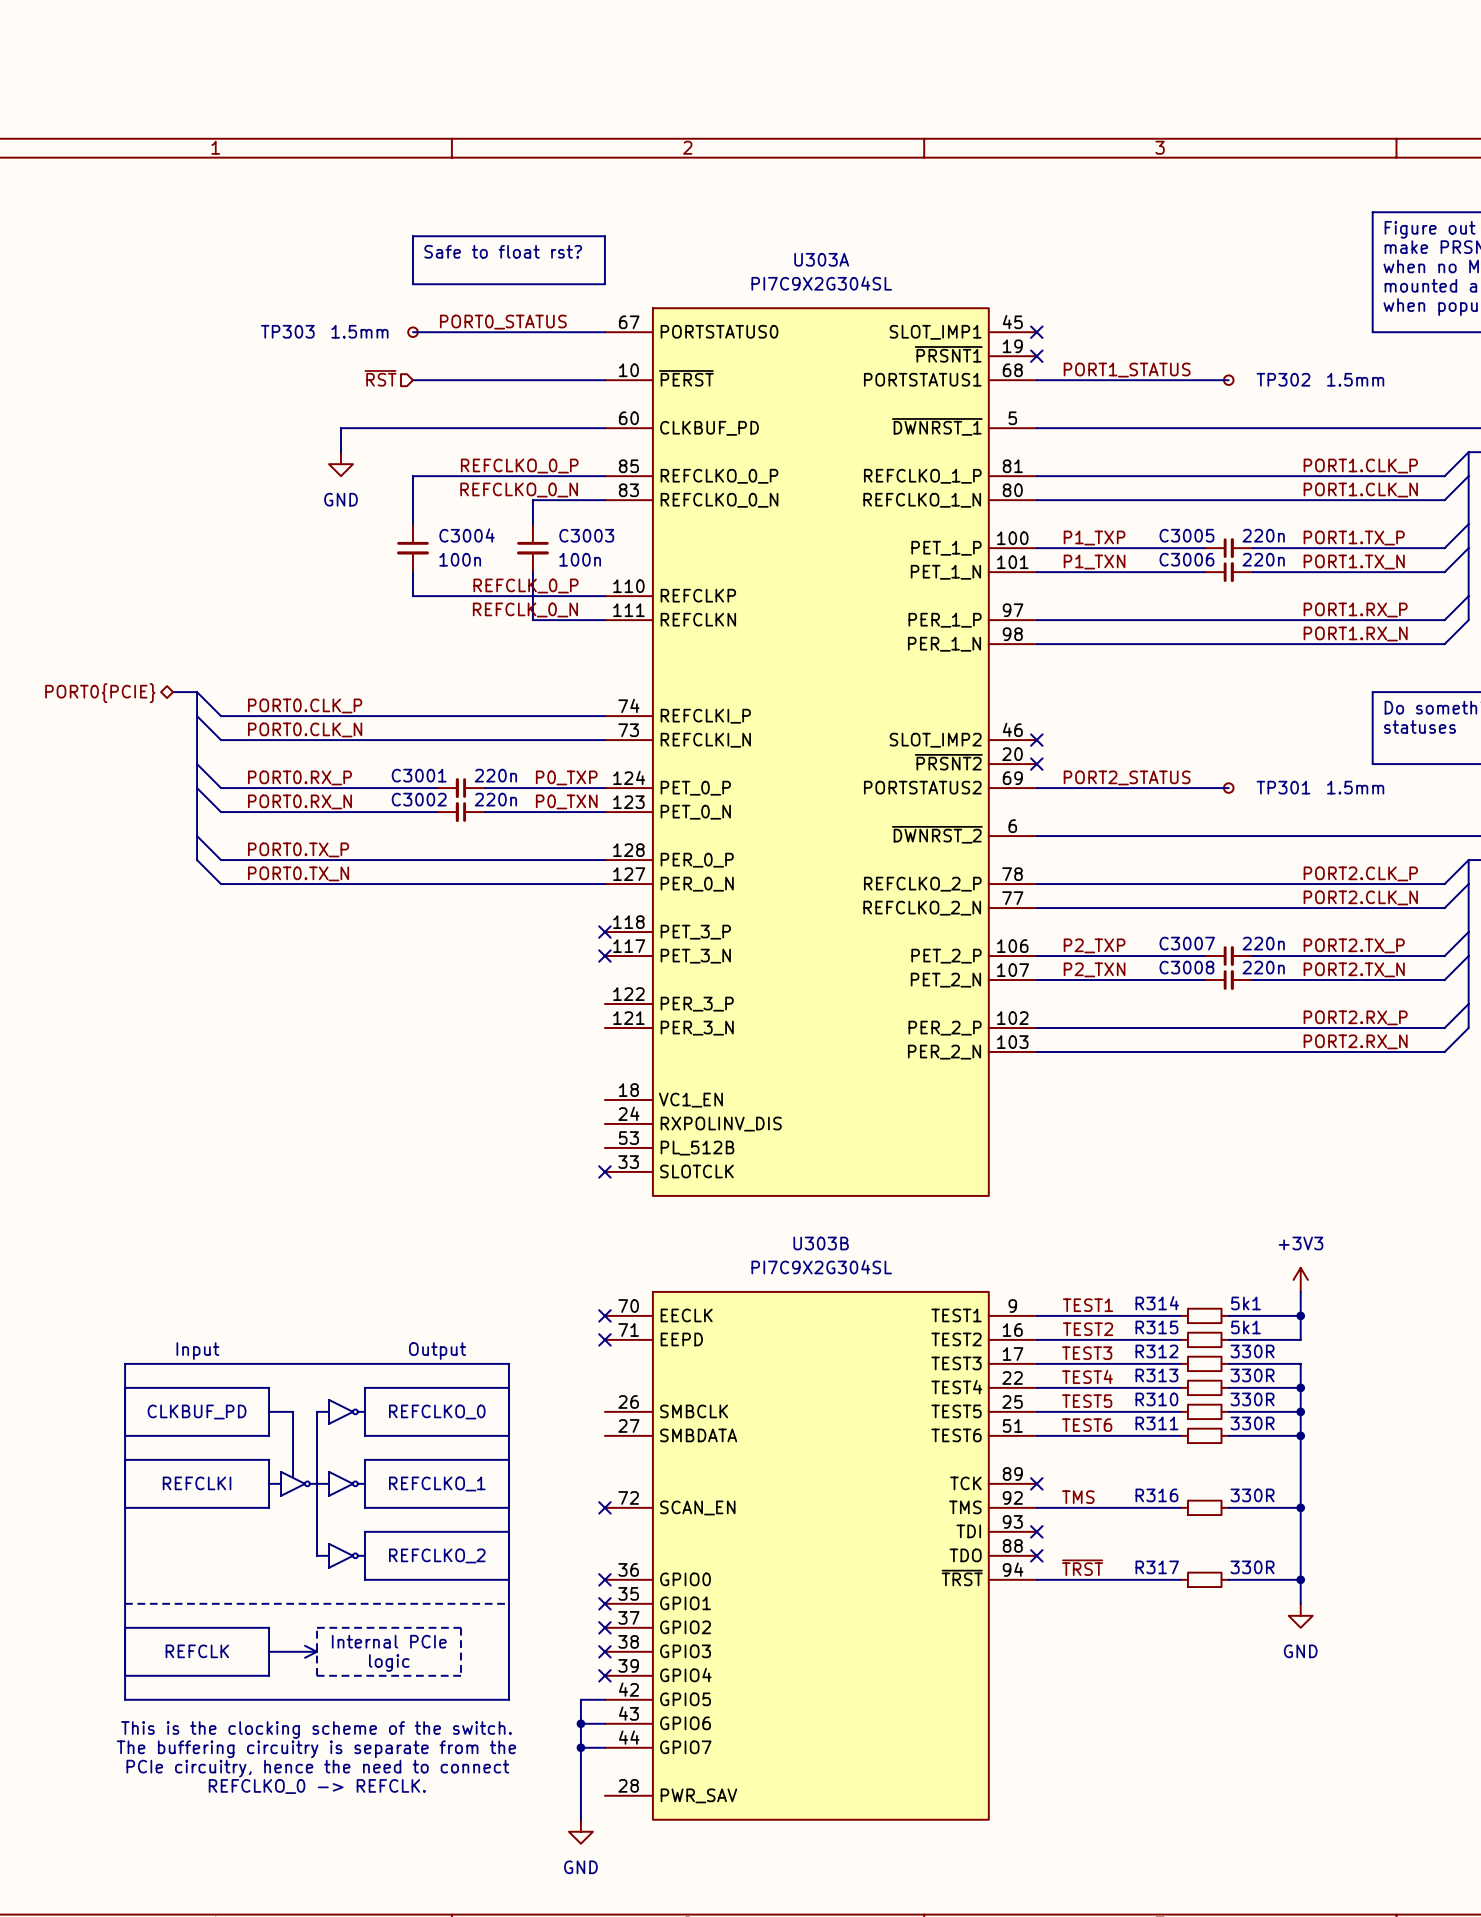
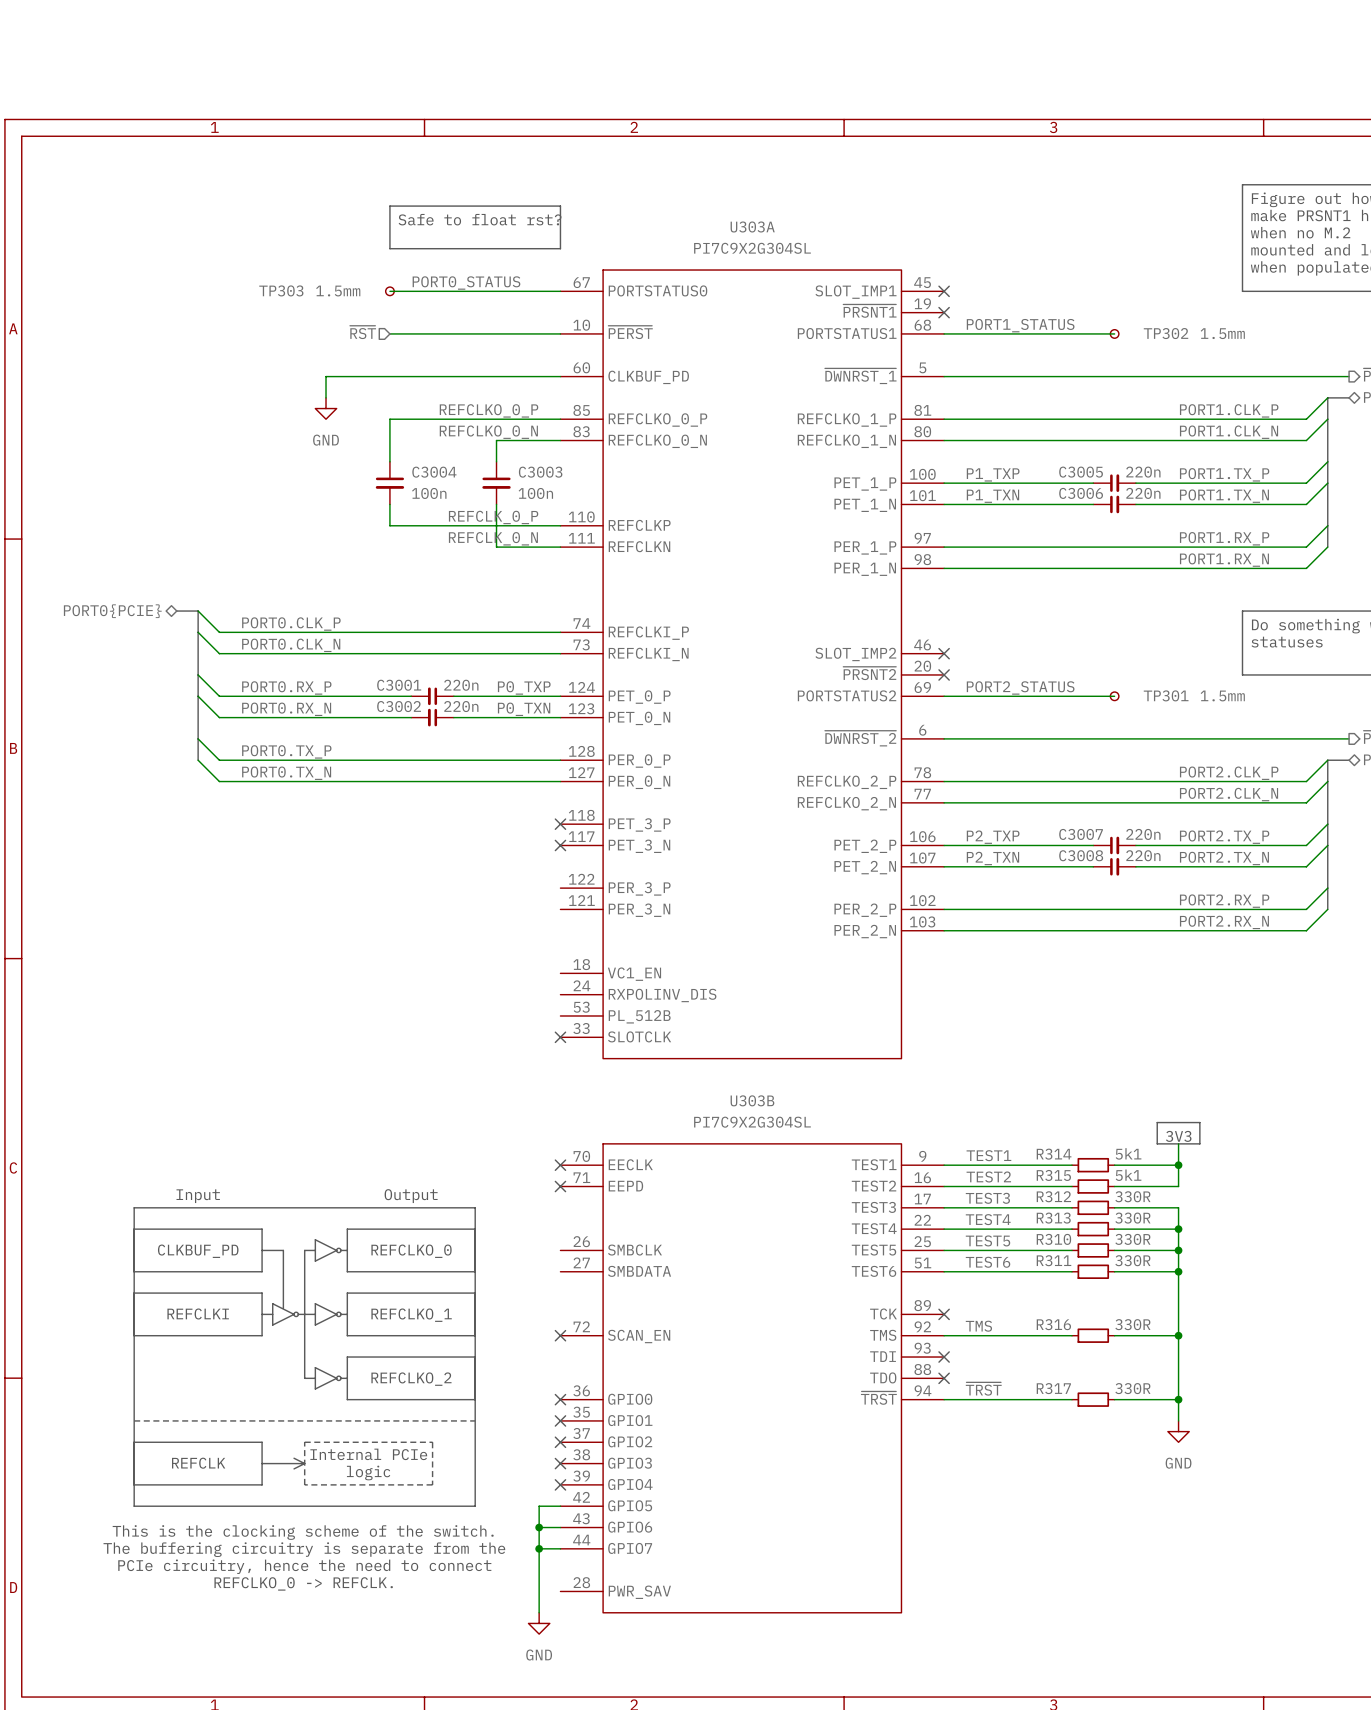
line: none -> (1157, 1122) (1199, 1122) (1199, 1143) (1157, 1143) (1157, 1122)
power symbol: +3V3 (1300, 1279) -> none
text: none -> 3V3 (1178, 1136)

